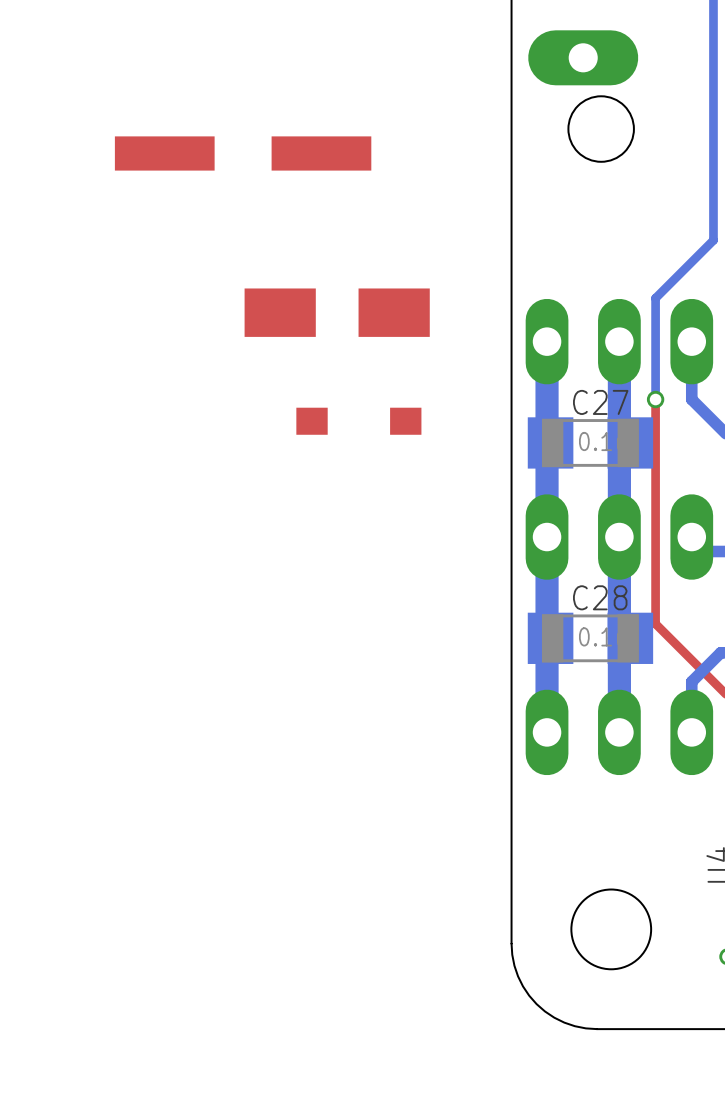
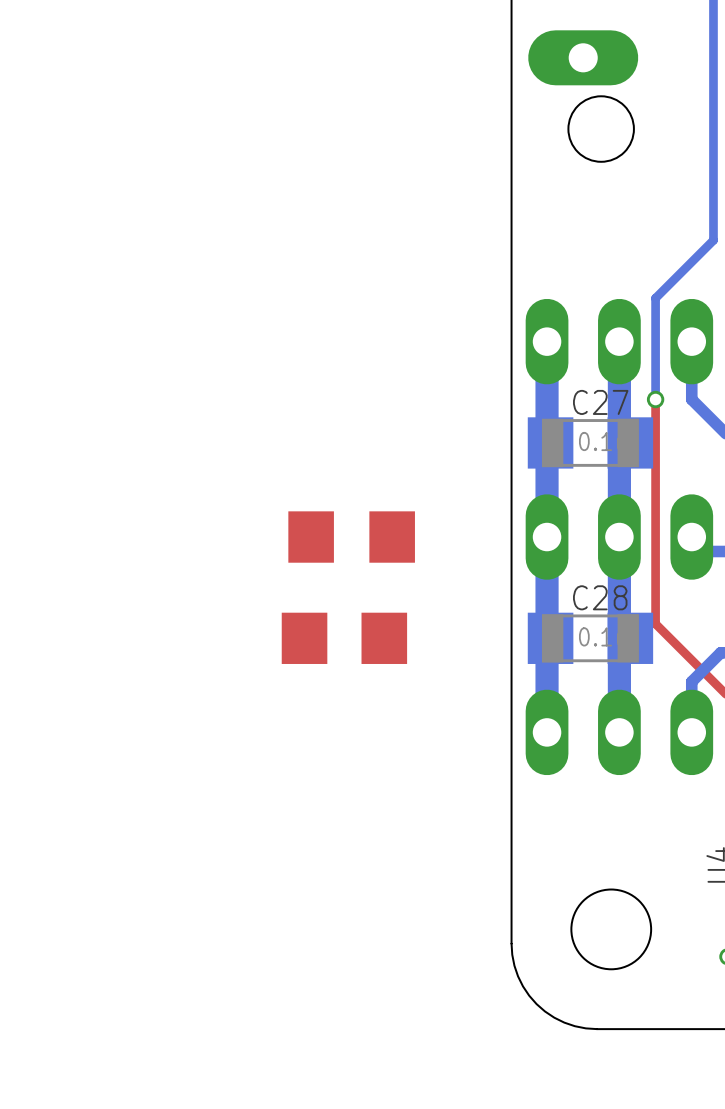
part: (243, 153) -> none
part: (337, 312) -> none
part: (358, 421) -> none
part: none -> (351, 537)
part: none -> (344, 638)

